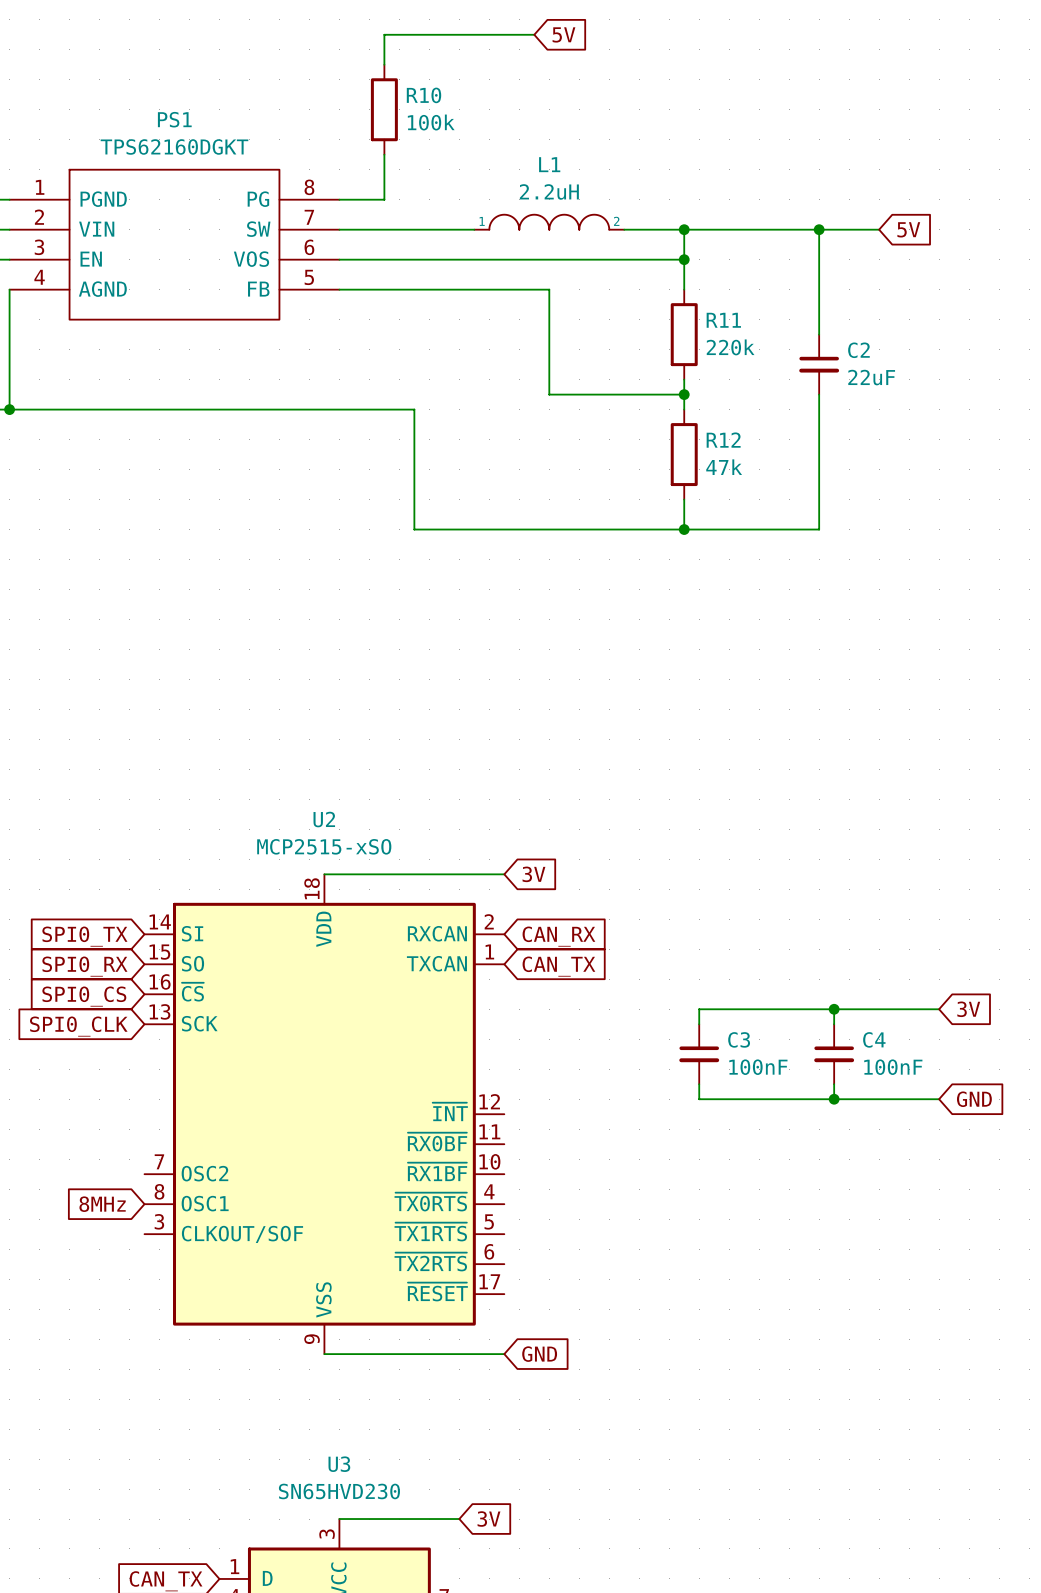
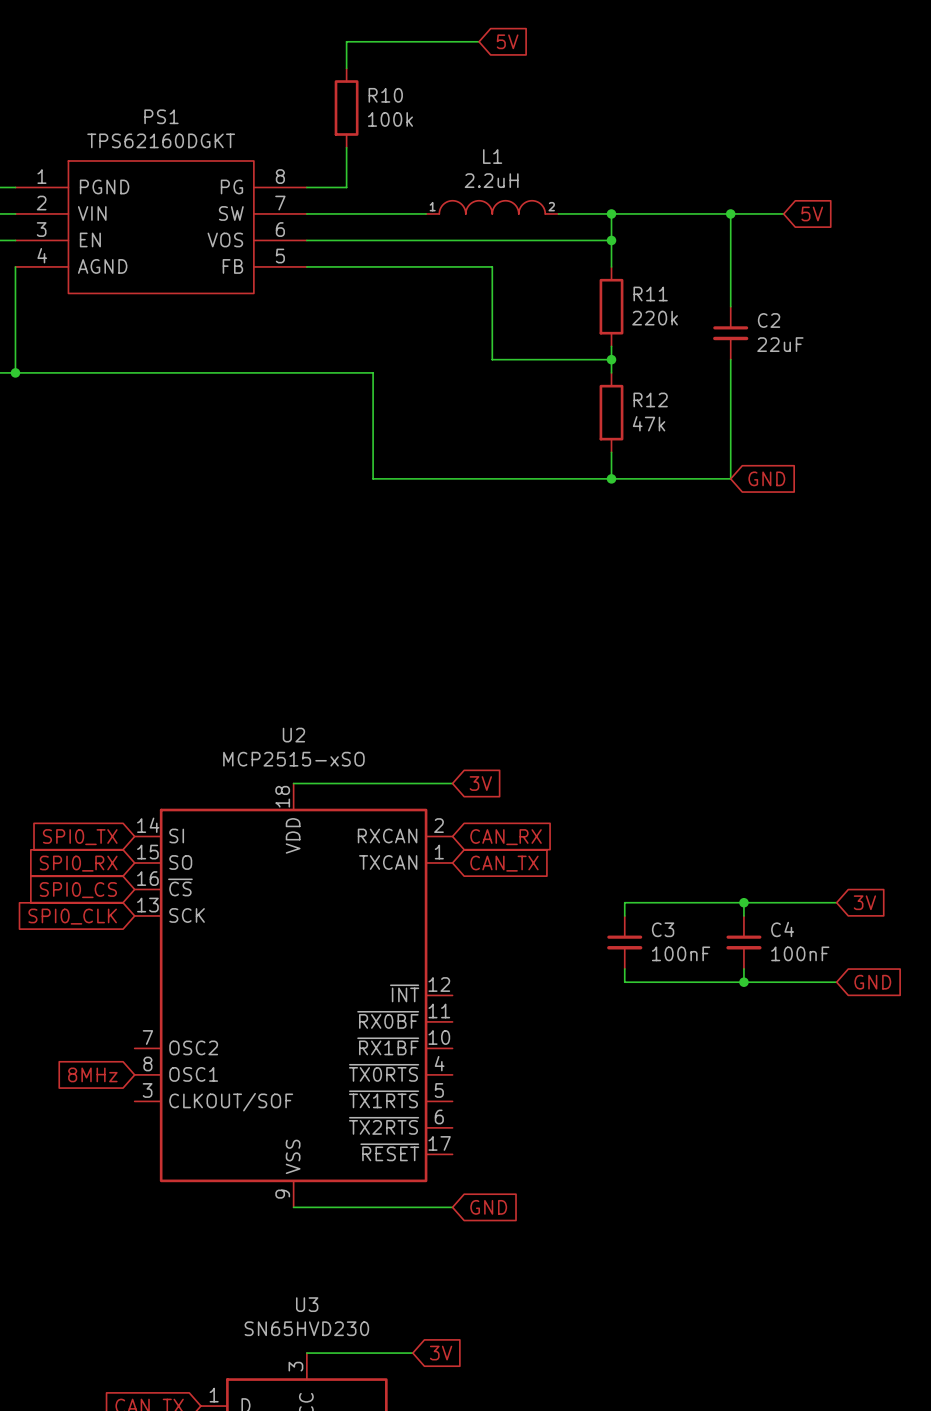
global label: none -> GND (766, 478)

